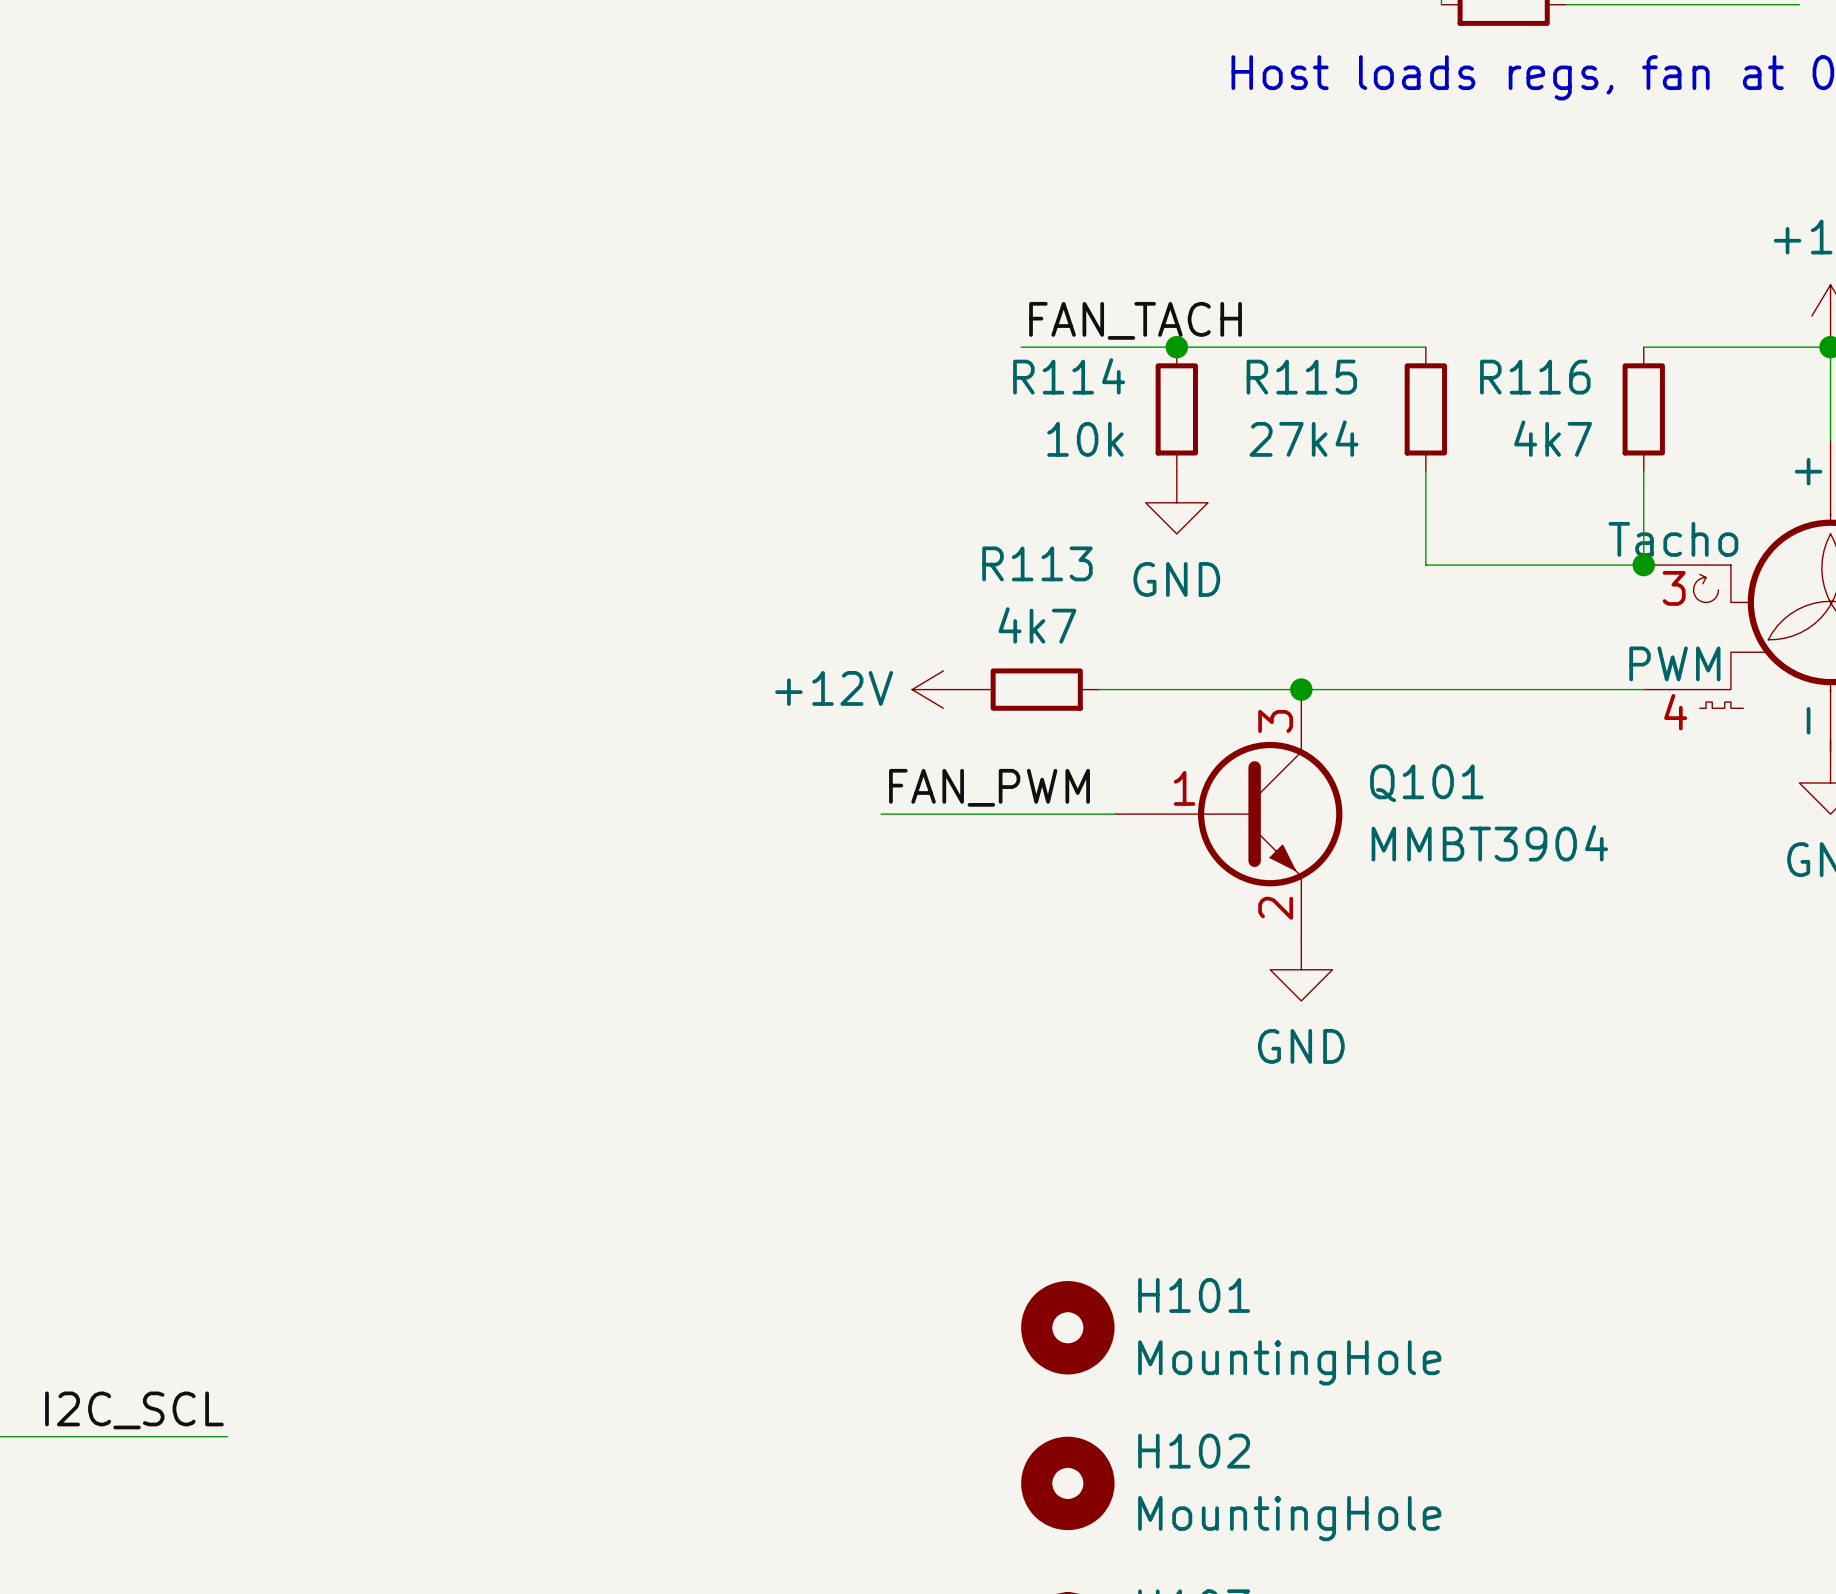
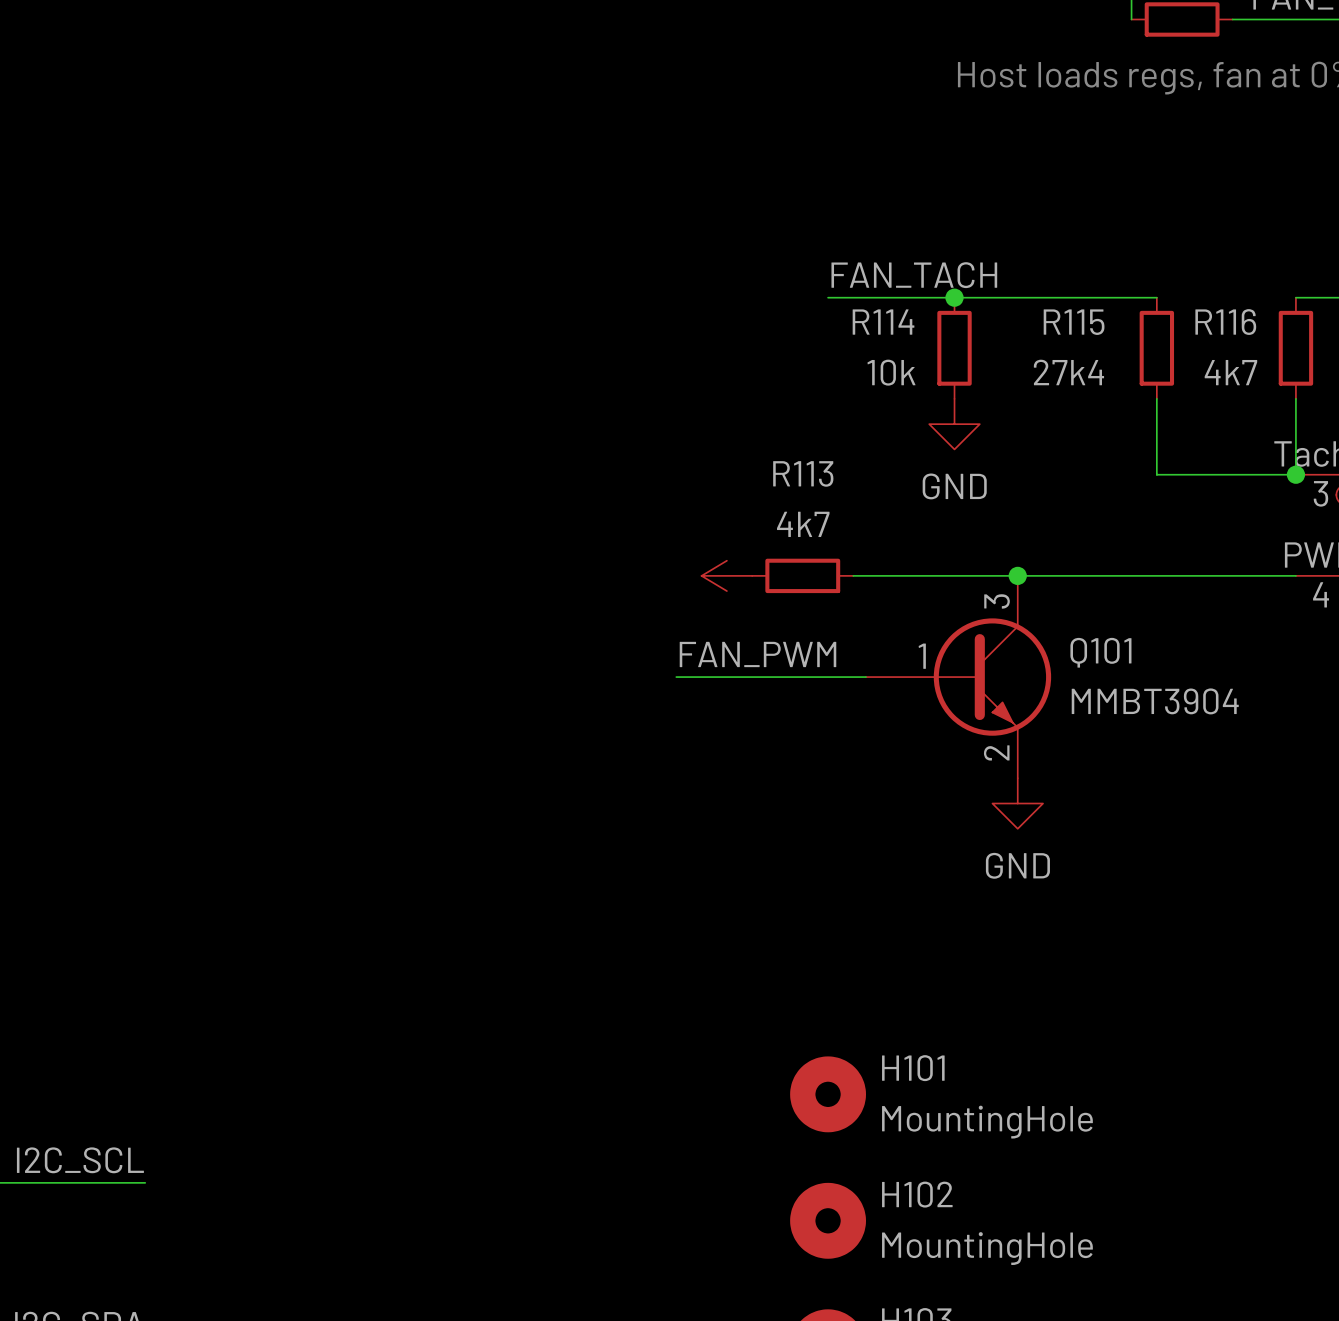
label position: FAN_TACH (1135, 320) -> FAN_TACH (914, 275)
wire: (1021, 347) (1067, 347) -> (1118, 297) (1156, 297)
junction position: (1176, 347) -> (954, 297)
R114 position: (1176, 409) -> (954, 348)
R115 position: (1425, 409) -> (1156, 348)
wire: (1425, 471) (1425, 565) (1472, 565) -> (1156, 398) (1156, 474)
power symbol position: GND (1176, 502) -> GND (954, 424)
power symbol text: +12V (834, 688) -> none

